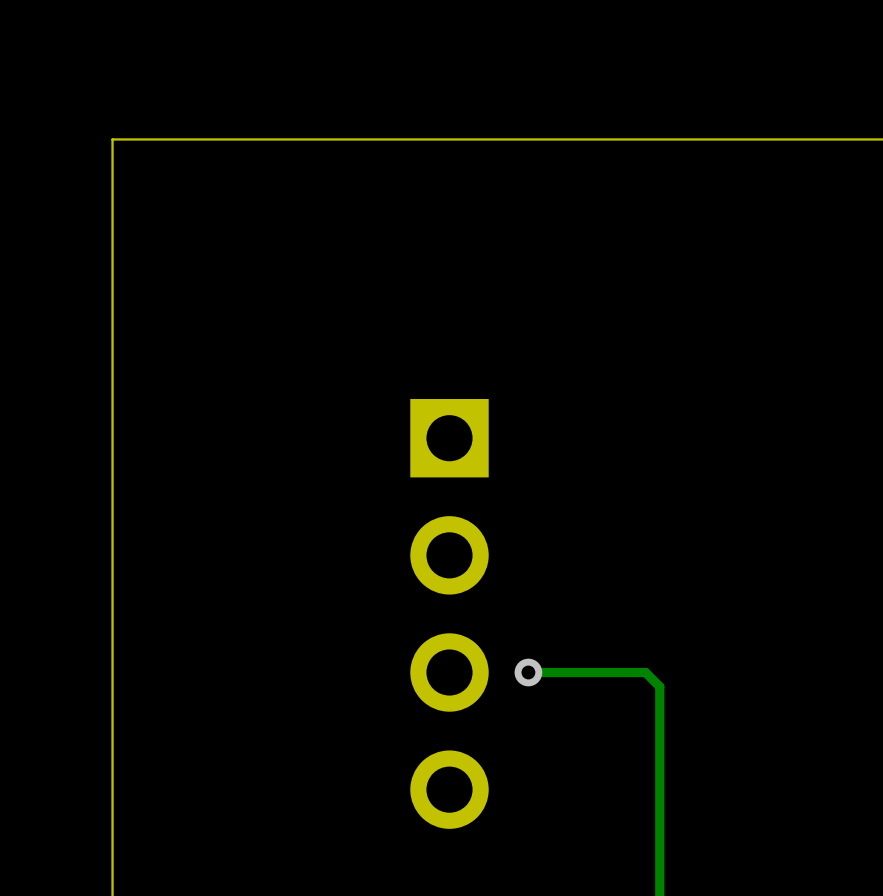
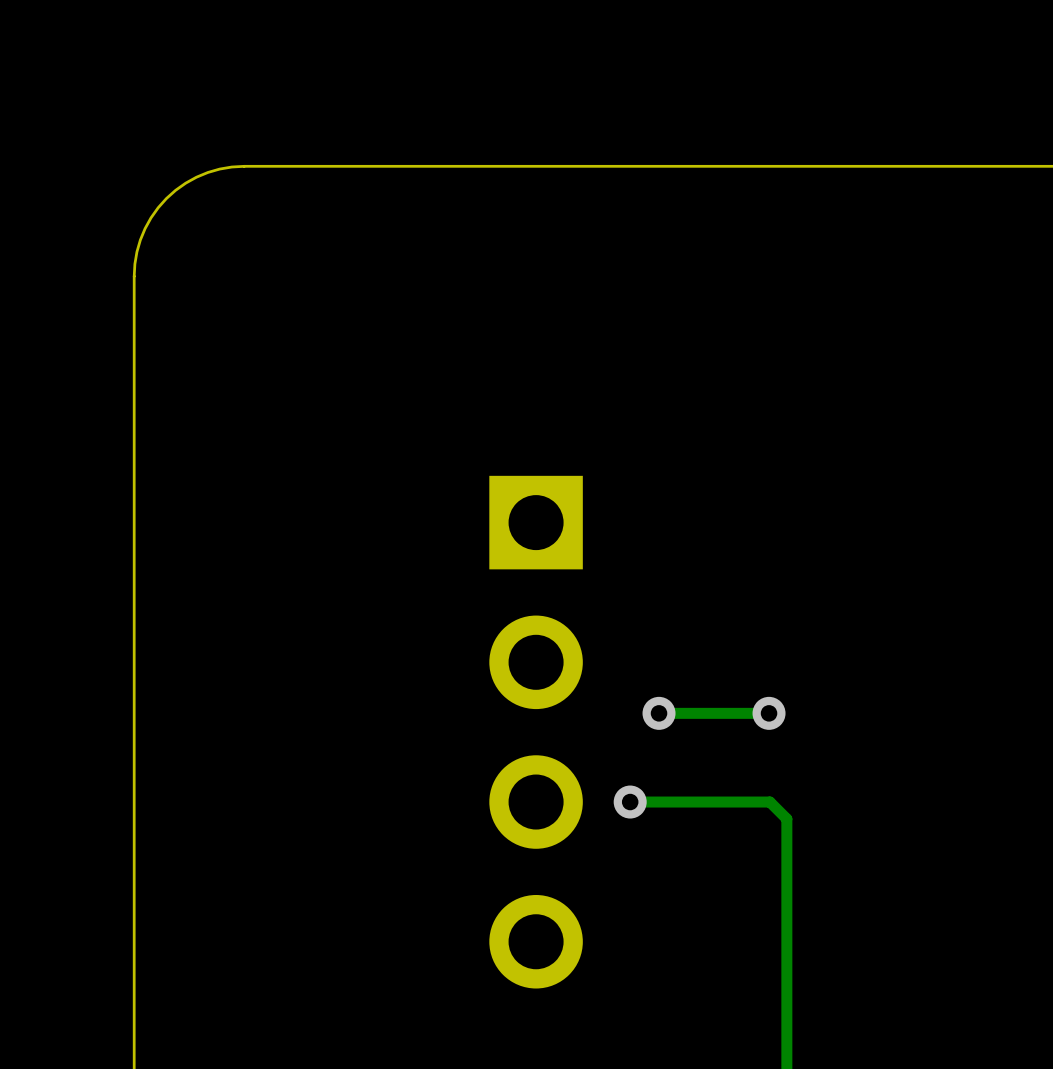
board edge: (204, 139) (112, 139) (112, 231) -> (244, 166) (207, 172) (185, 183) (166, 198) (151, 217) (140, 239) (134, 276)
via: none -> (659, 713)
track: none -> (769, 713) (659, 713)
via: none -> (769, 713)

